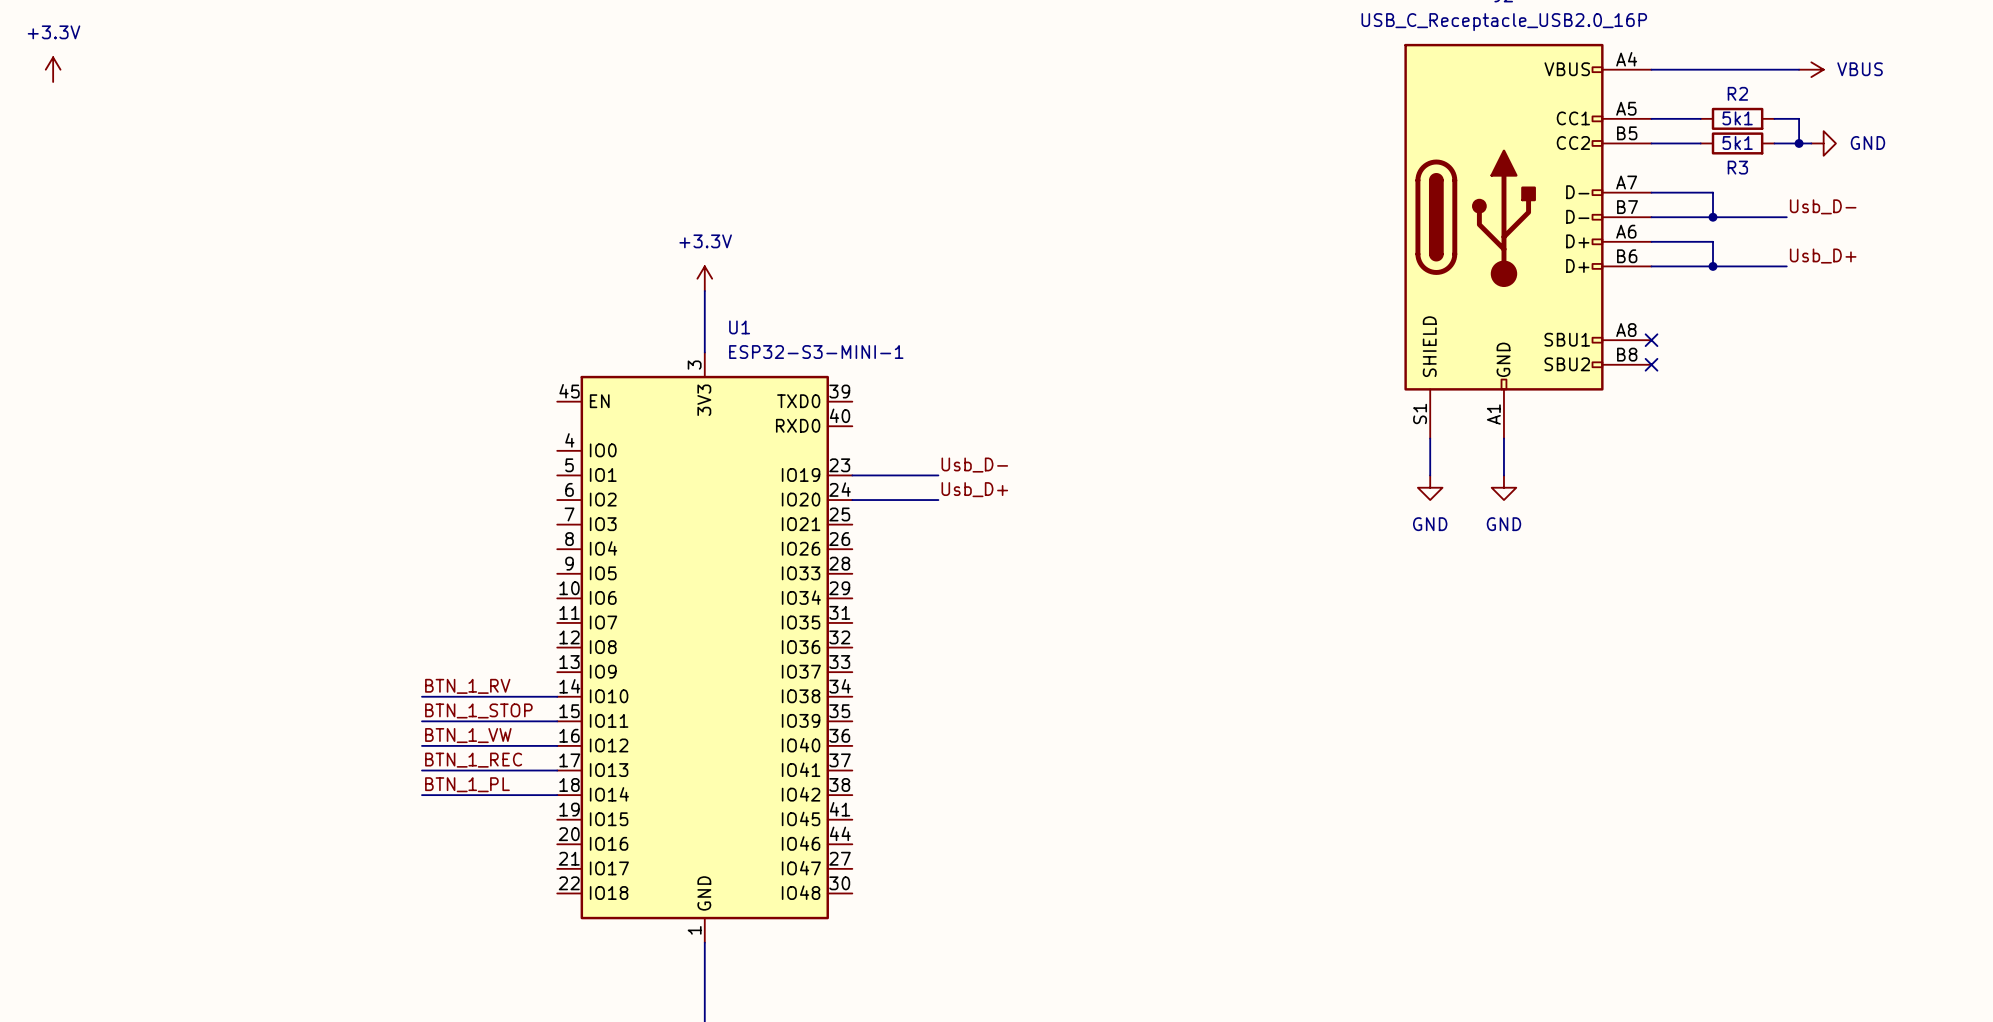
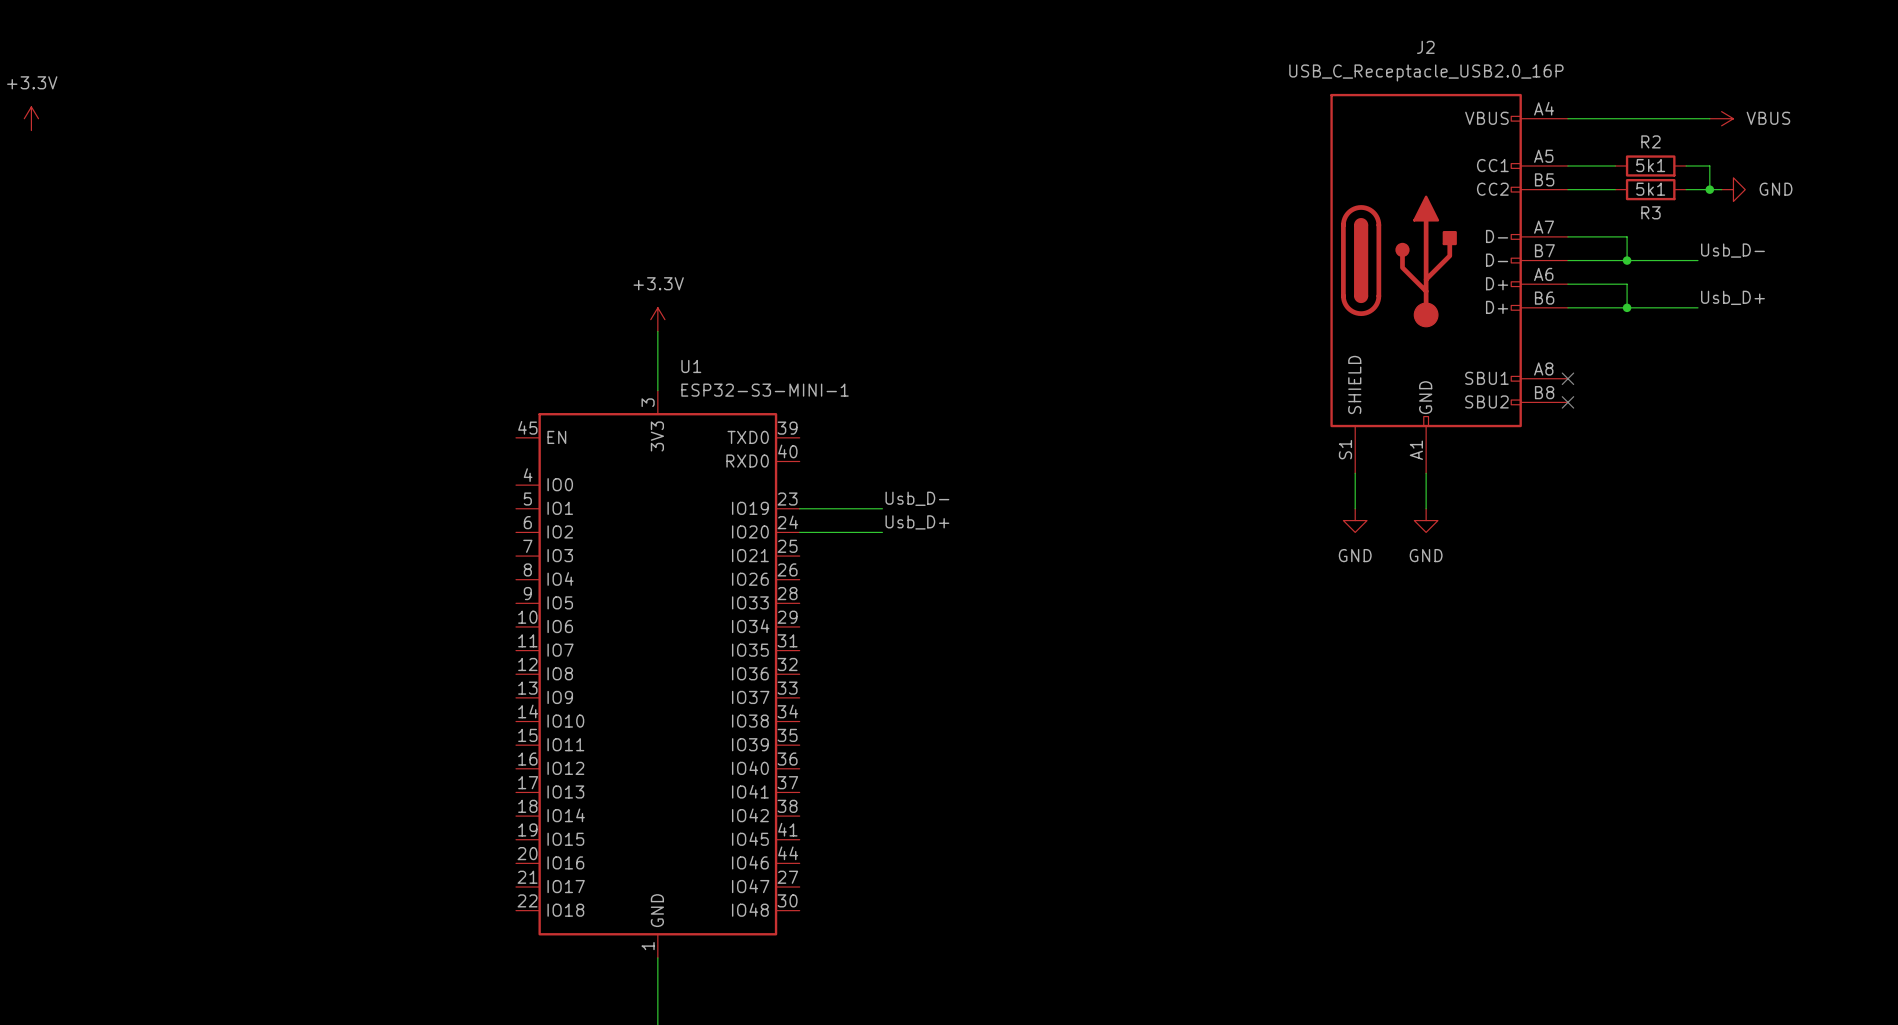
label: BTN_1_RV (467, 686) -> none
wire: (421, 696) (557, 696) -> none
label: BTN_1_STOP (478, 710) -> none
wire: (421, 721) (557, 721) -> none
label: BTN_1_VW (468, 735) -> none
wire: (421, 745) (557, 745) -> none
label: BTN_1_REC (473, 760) -> none
wire: (421, 770) (557, 770) -> none
label: BTN_1_PL (467, 784) -> none
wire: (421, 795) (557, 795) -> none

